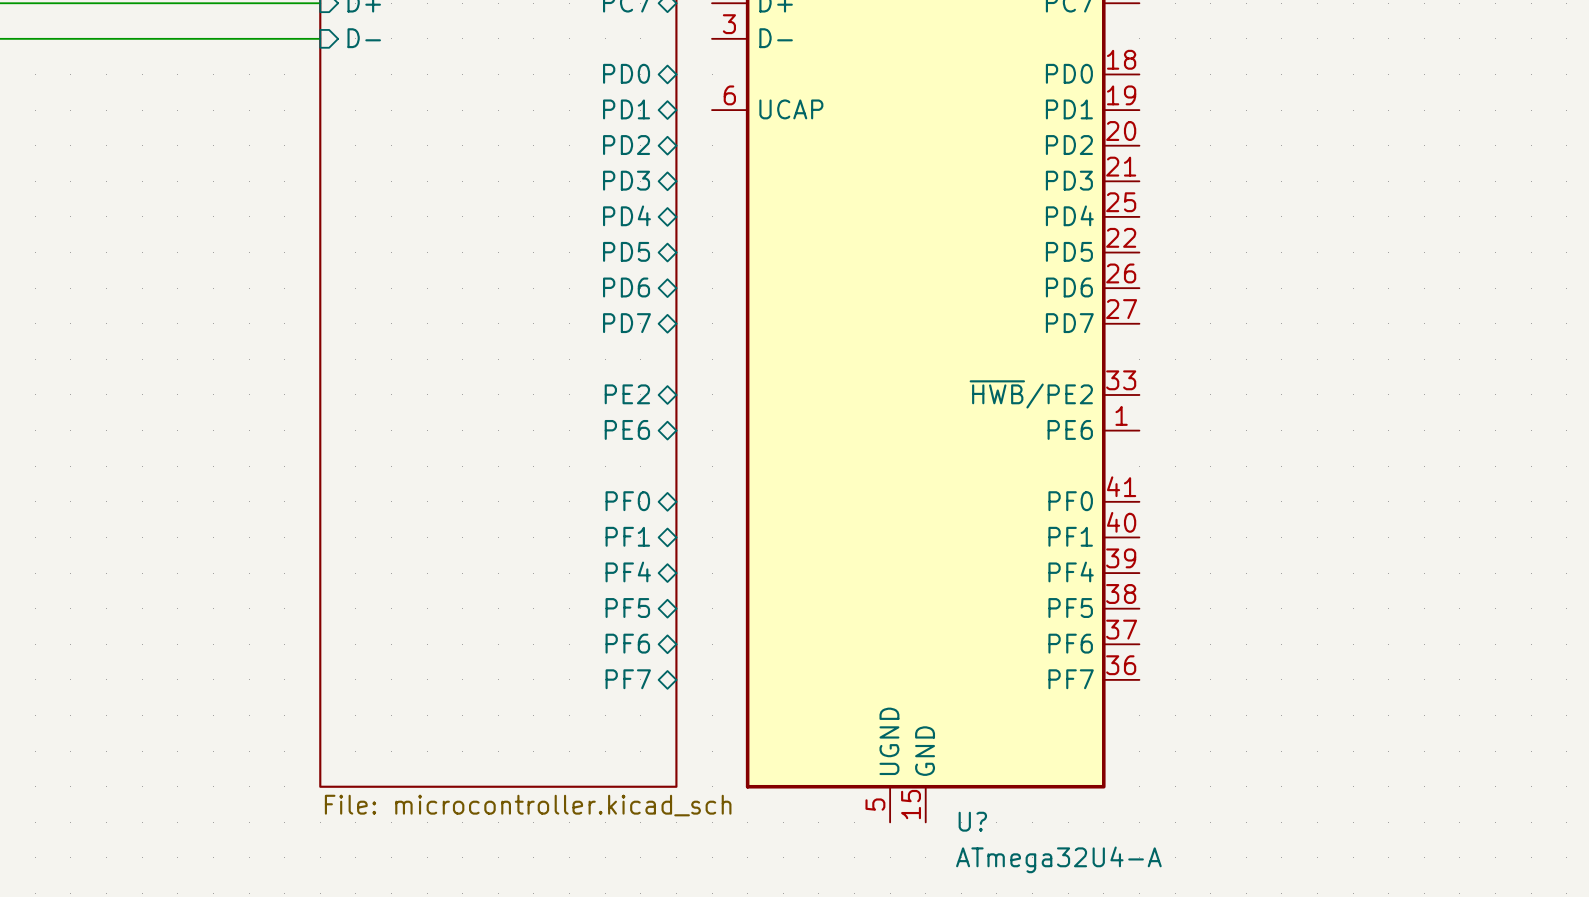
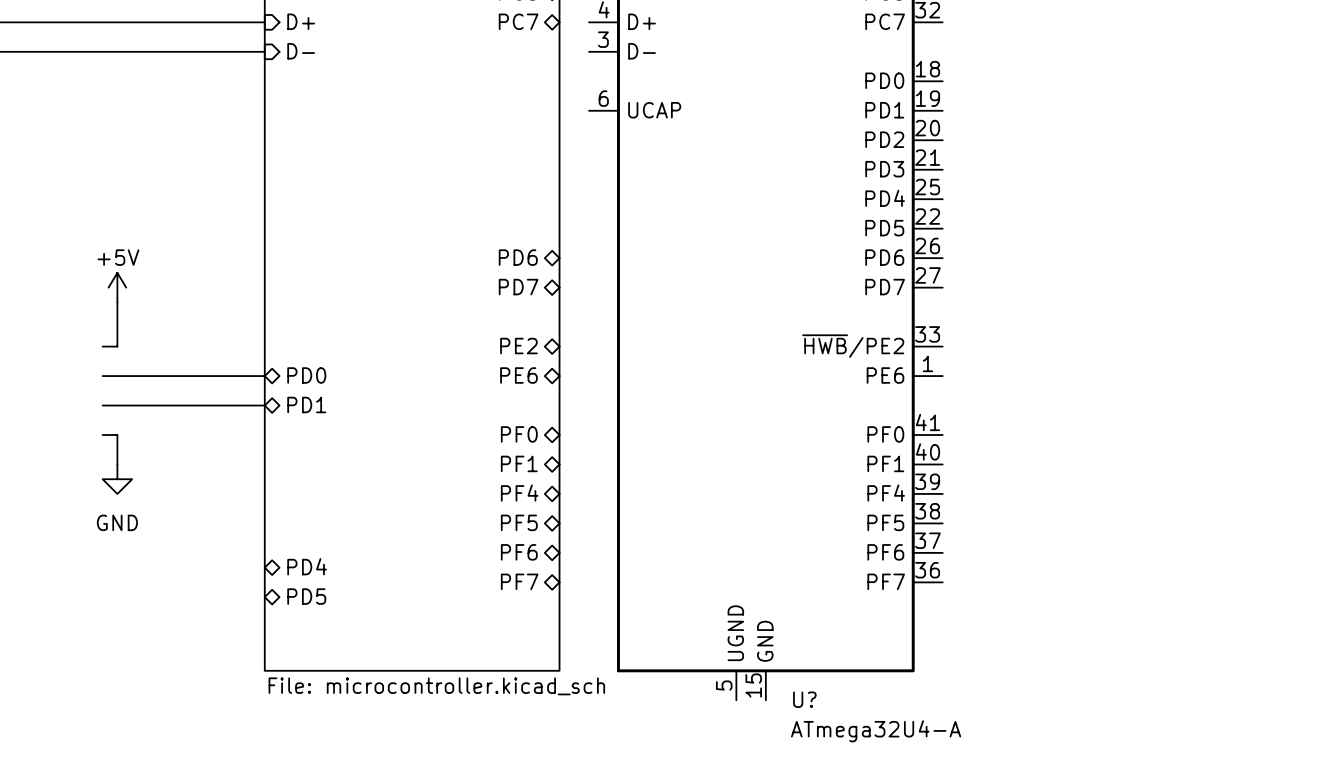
sheet pin: PD0 (626, 73) -> none
sheet pin: PD1 (626, 109) -> none
sheet pin: PD2 (626, 145) -> none
sheet pin: PD3 (626, 180) -> none
sheet pin: PD4 (626, 215) -> none
sheet pin: PD5 (626, 251) -> none
power symbol: none -> +5V (117, 287)
wire: none -> (117, 302) (117, 346) (102, 346)
sheet pin: none -> PD0 (306, 375)
wire: none -> (102, 376) (264, 376)
sheet pin: none -> PD1 (306, 404)
wire: none -> (102, 405) (264, 405)
wire: none -> (102, 435) (117, 435) (117, 464)
power symbol: none -> GND (117, 479)
sheet pin: none -> PD4 (307, 566)
sheet pin: none -> PD5 (306, 596)

